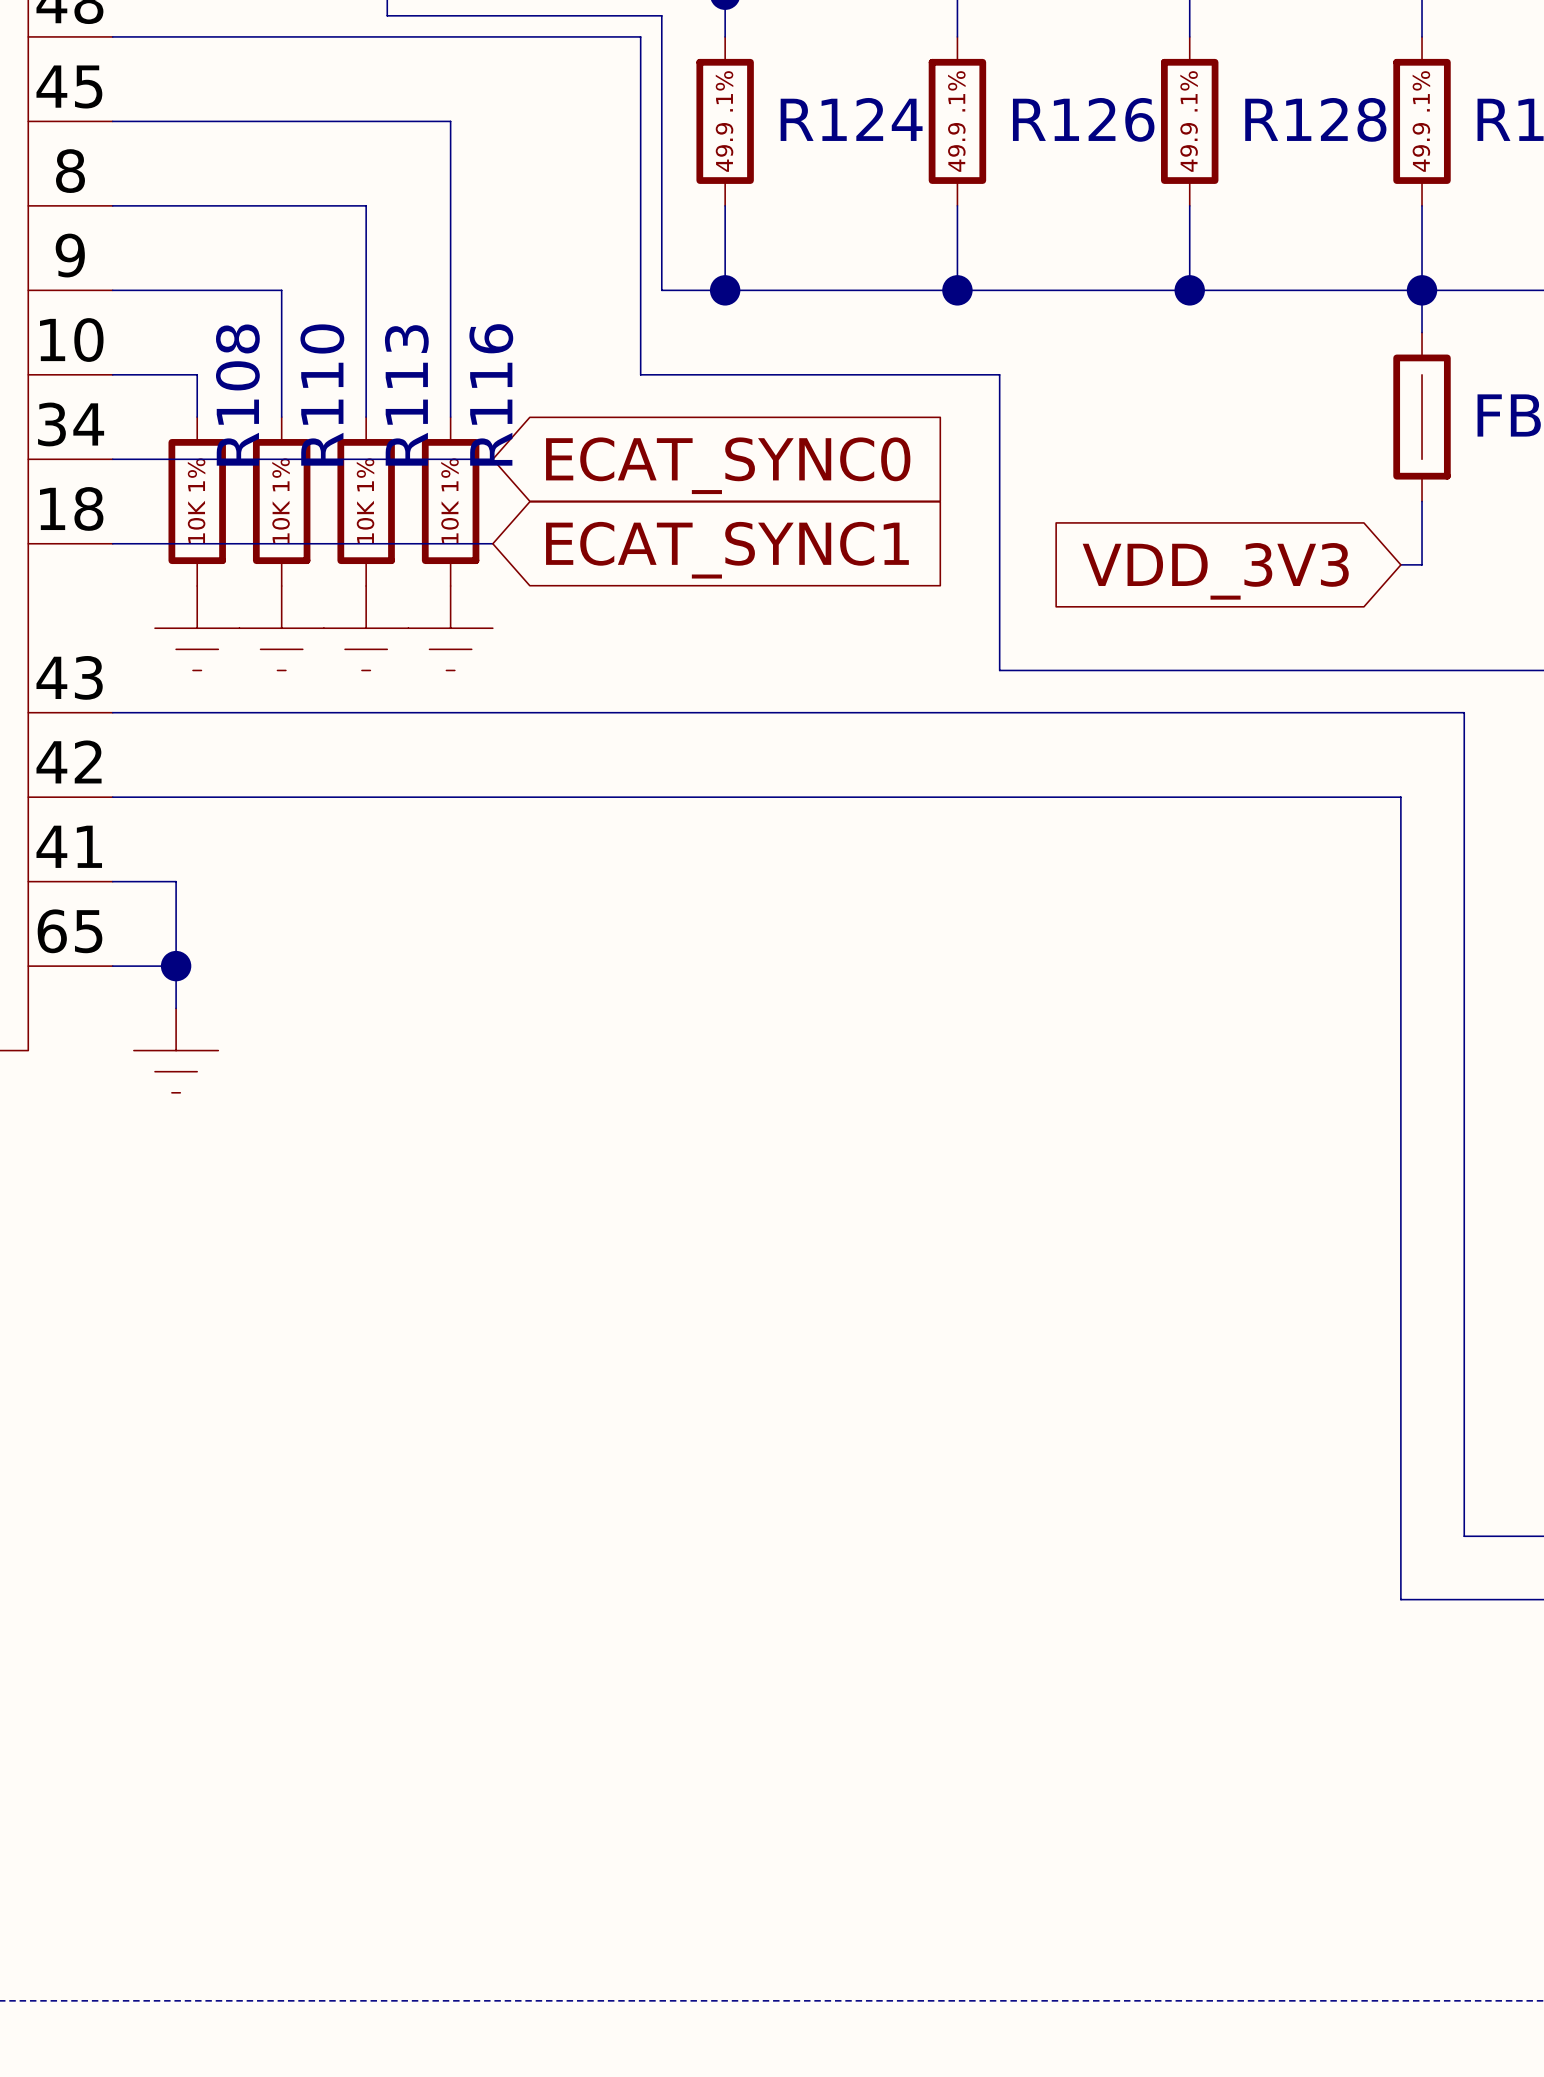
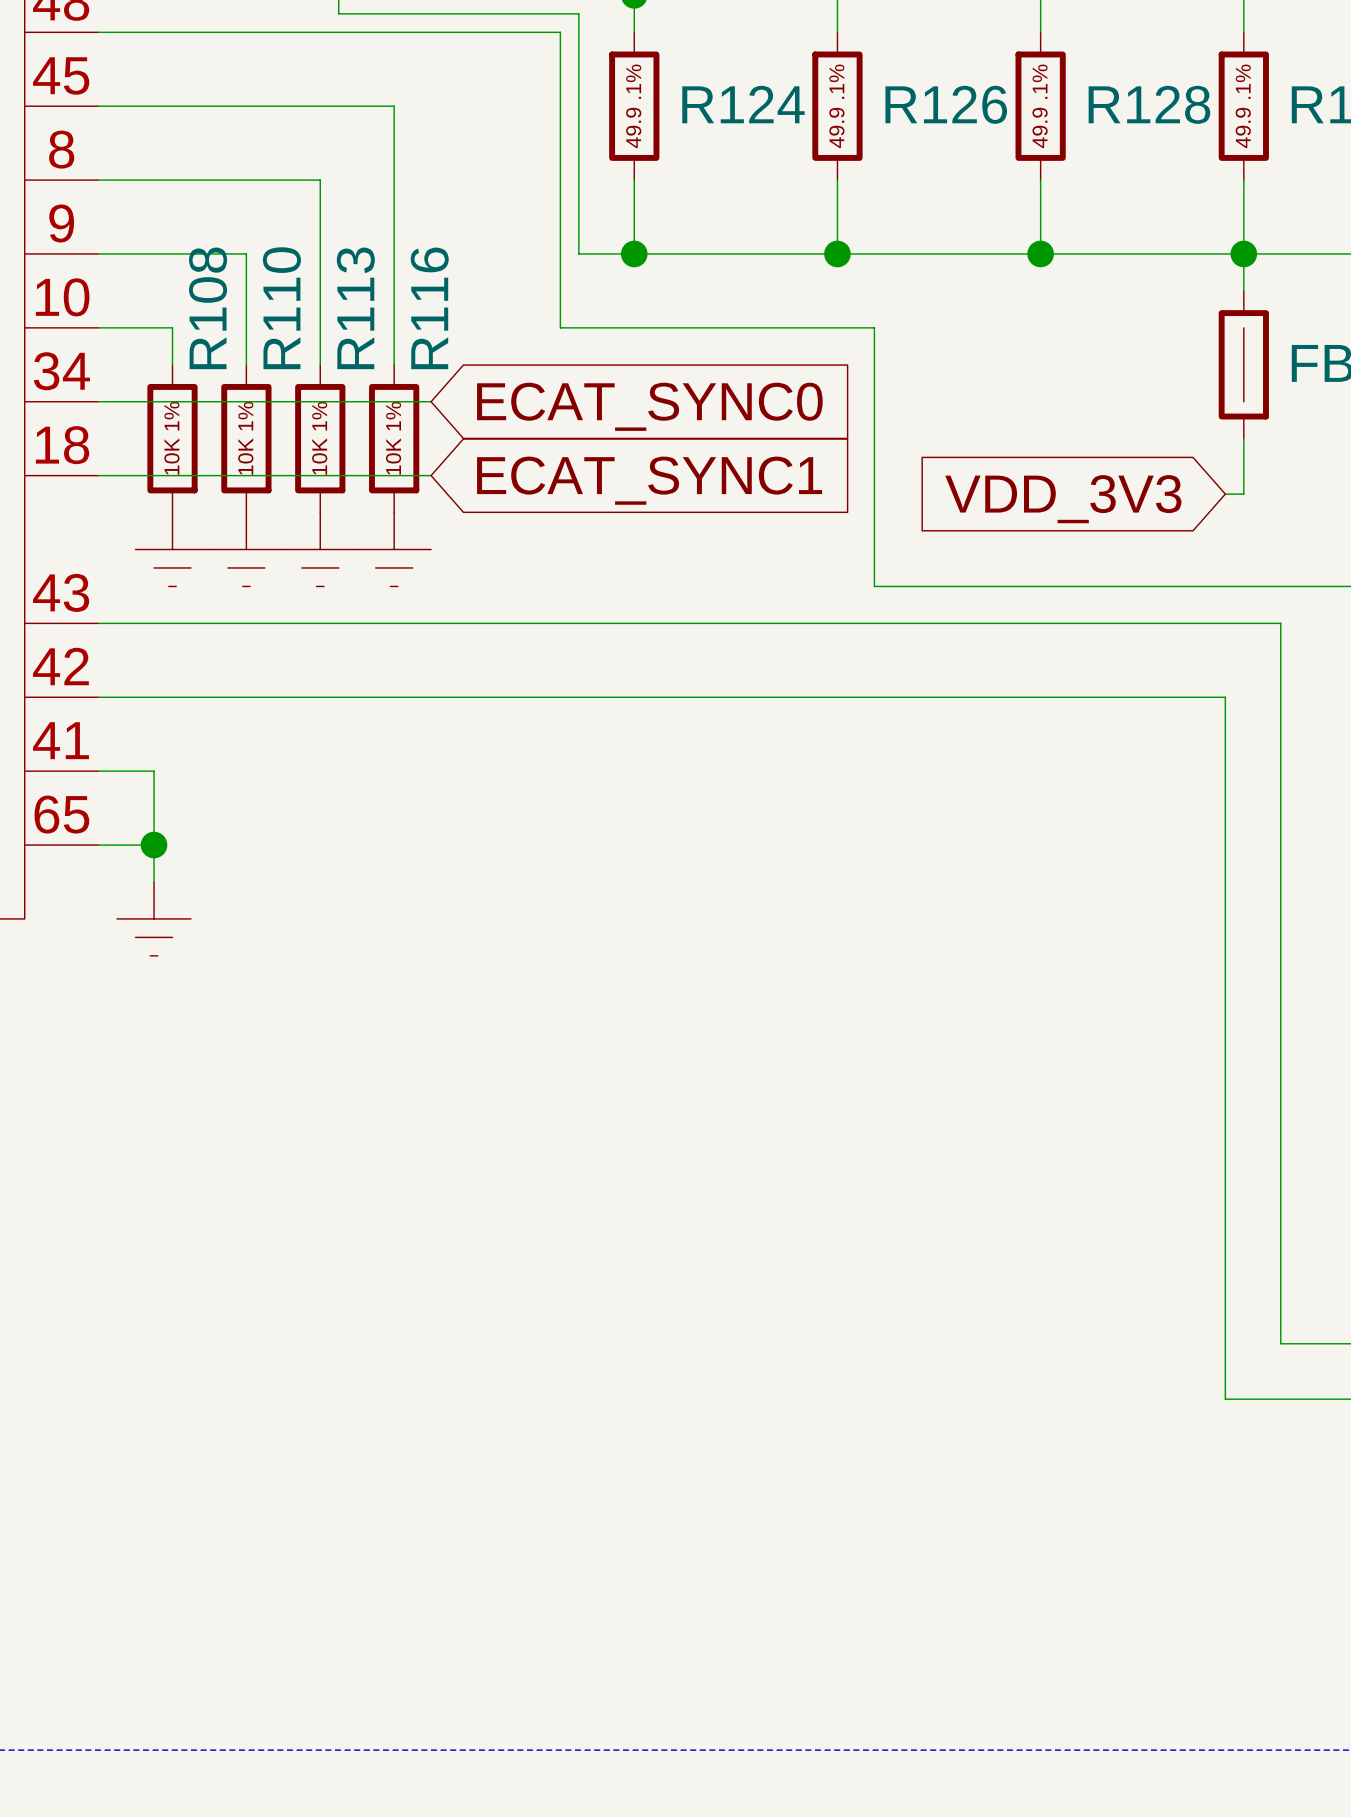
R116 name position: R116 (491, 394) -> R116 (429, 308)
R108 name position: R108 (237, 395) -> R108 (208, 308)
R110 name position: R110 (322, 395) -> R110 (281, 308)
R113 name position: R113 (406, 395) -> R113 (355, 308)

